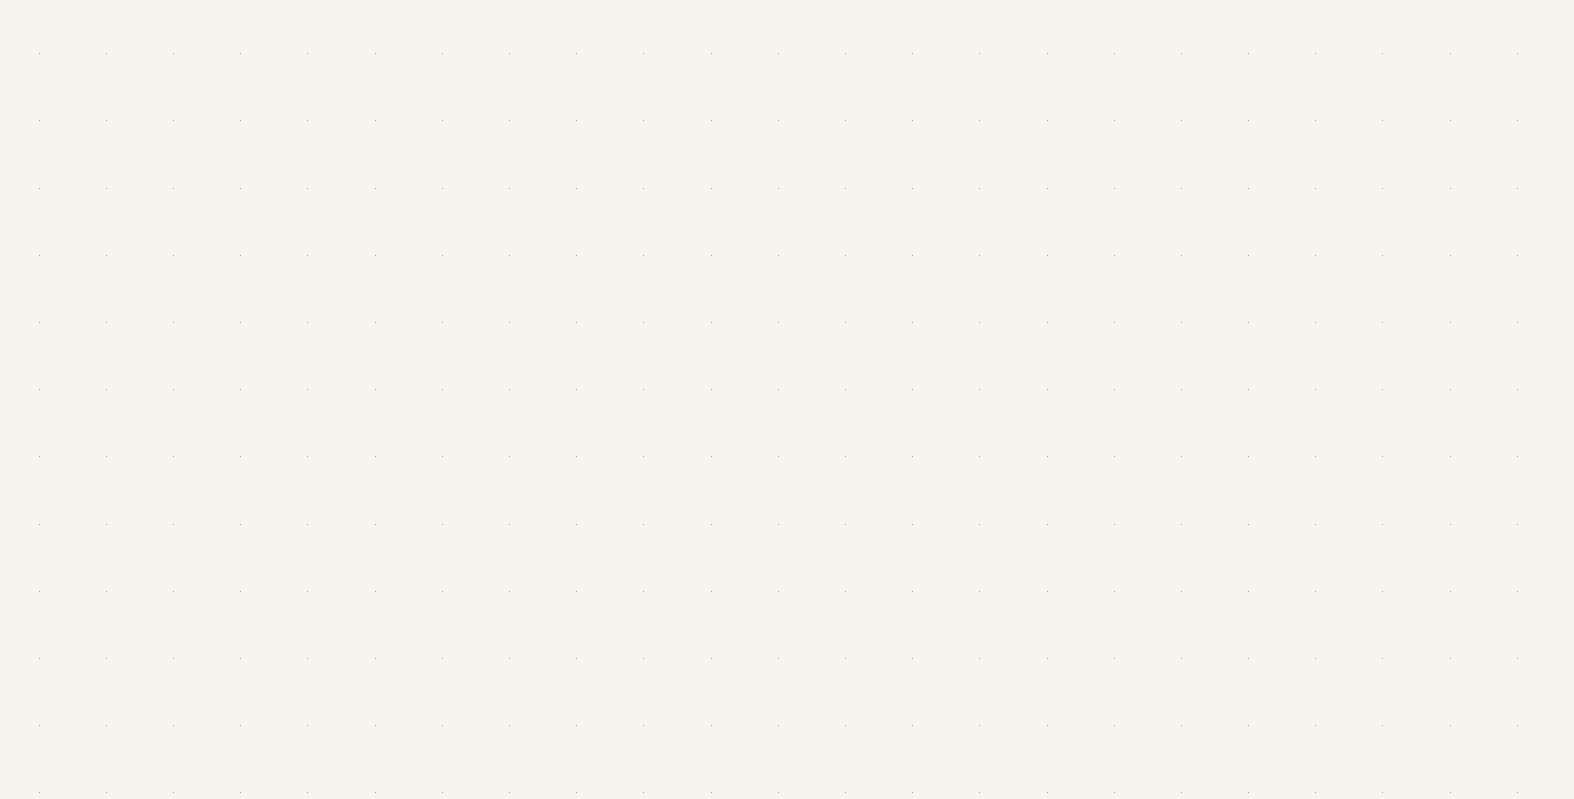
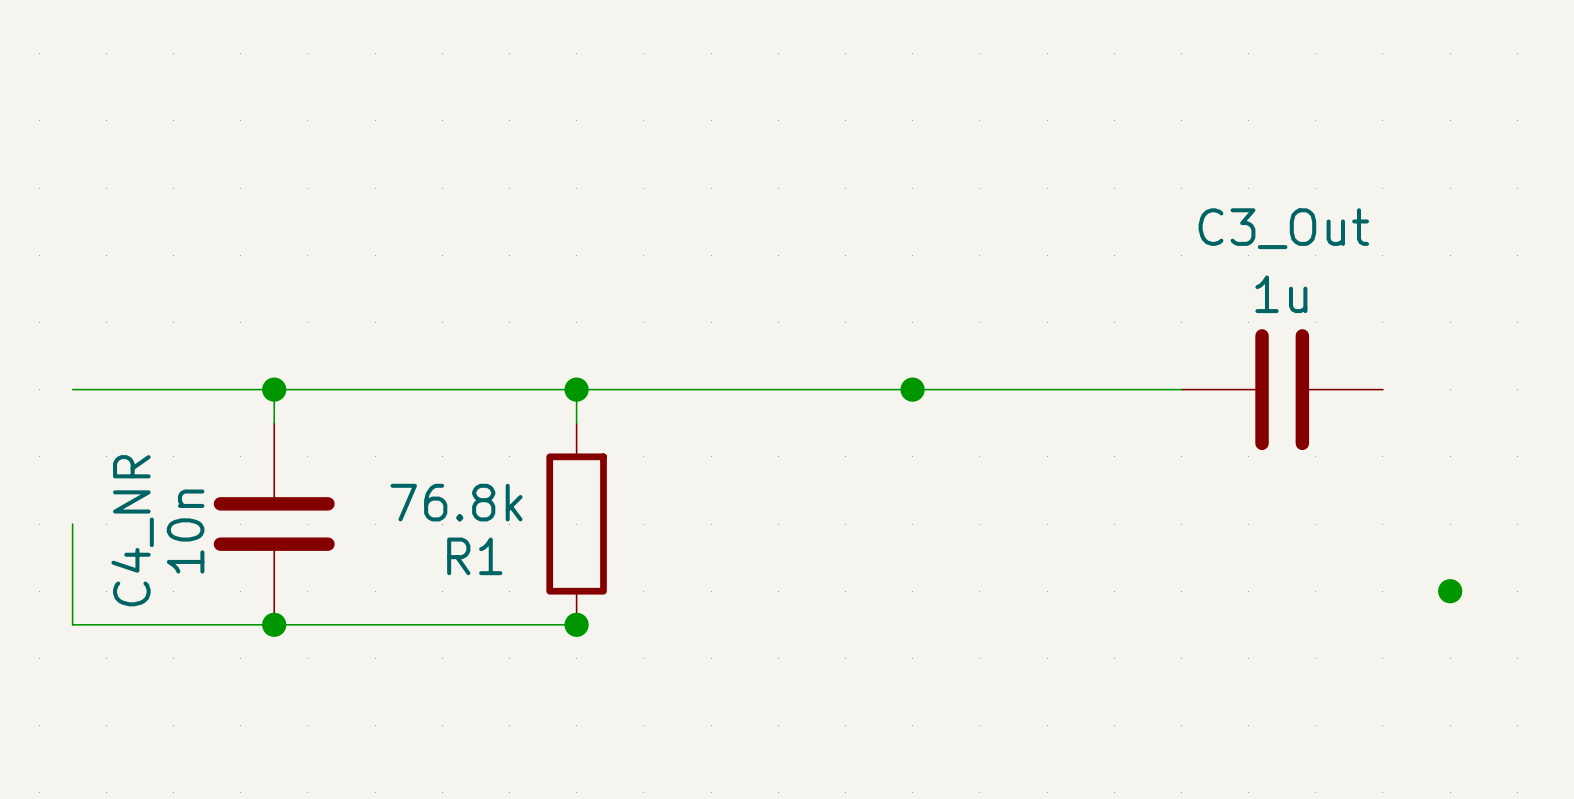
wire: none -> (72, 389) (1181, 389)
wire: none -> (274, 389) (274, 423)
junction: none -> (274, 389)
wire: none -> (576, 389) (576, 423)
junction: none -> (576, 389)
junction: none -> (912, 389)
C3_Out: none -> 1u (1282, 389)
wire: none -> (72, 524) (72, 624) (576, 624)
C4_NR: none -> 10n (274, 524)
R1: none -> 76.8k (576, 524)
junction: none -> (1450, 591)
junction: none -> (274, 624)
junction: none -> (576, 624)

